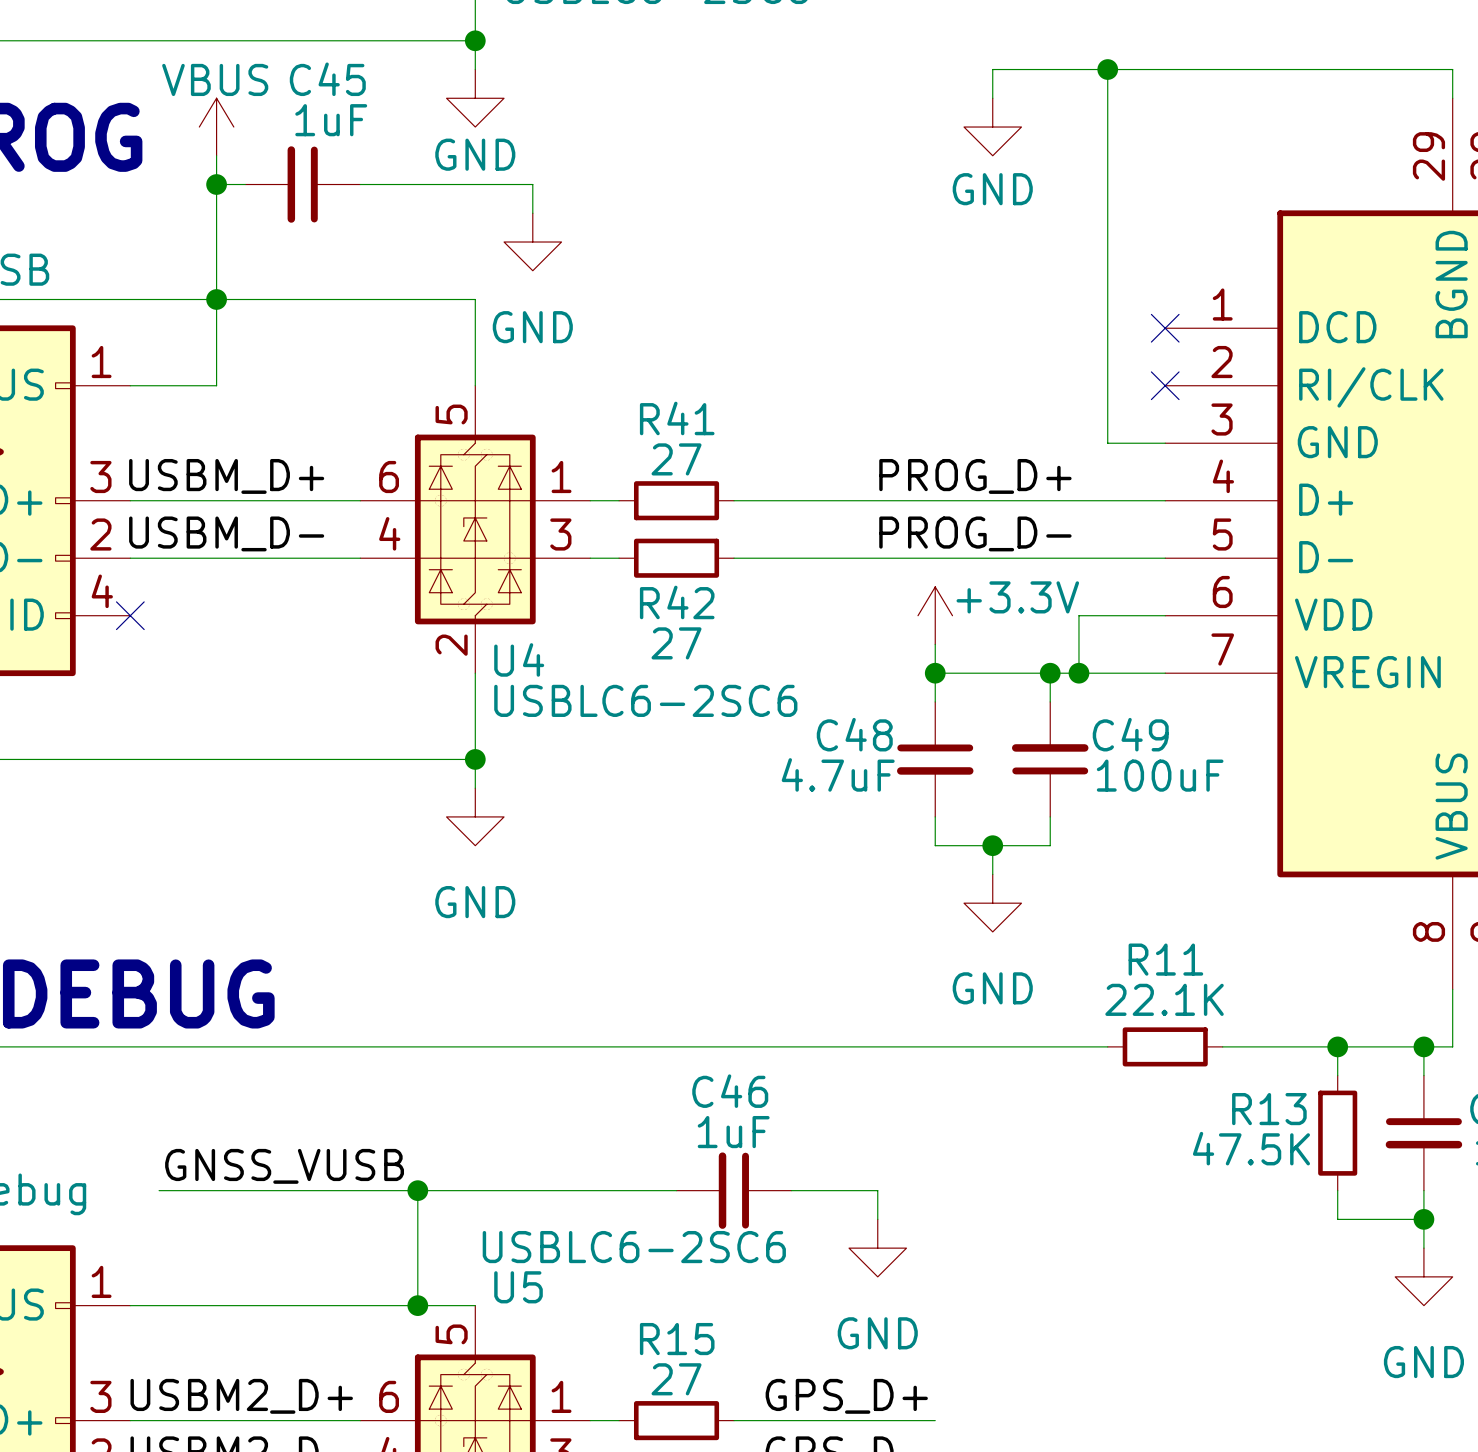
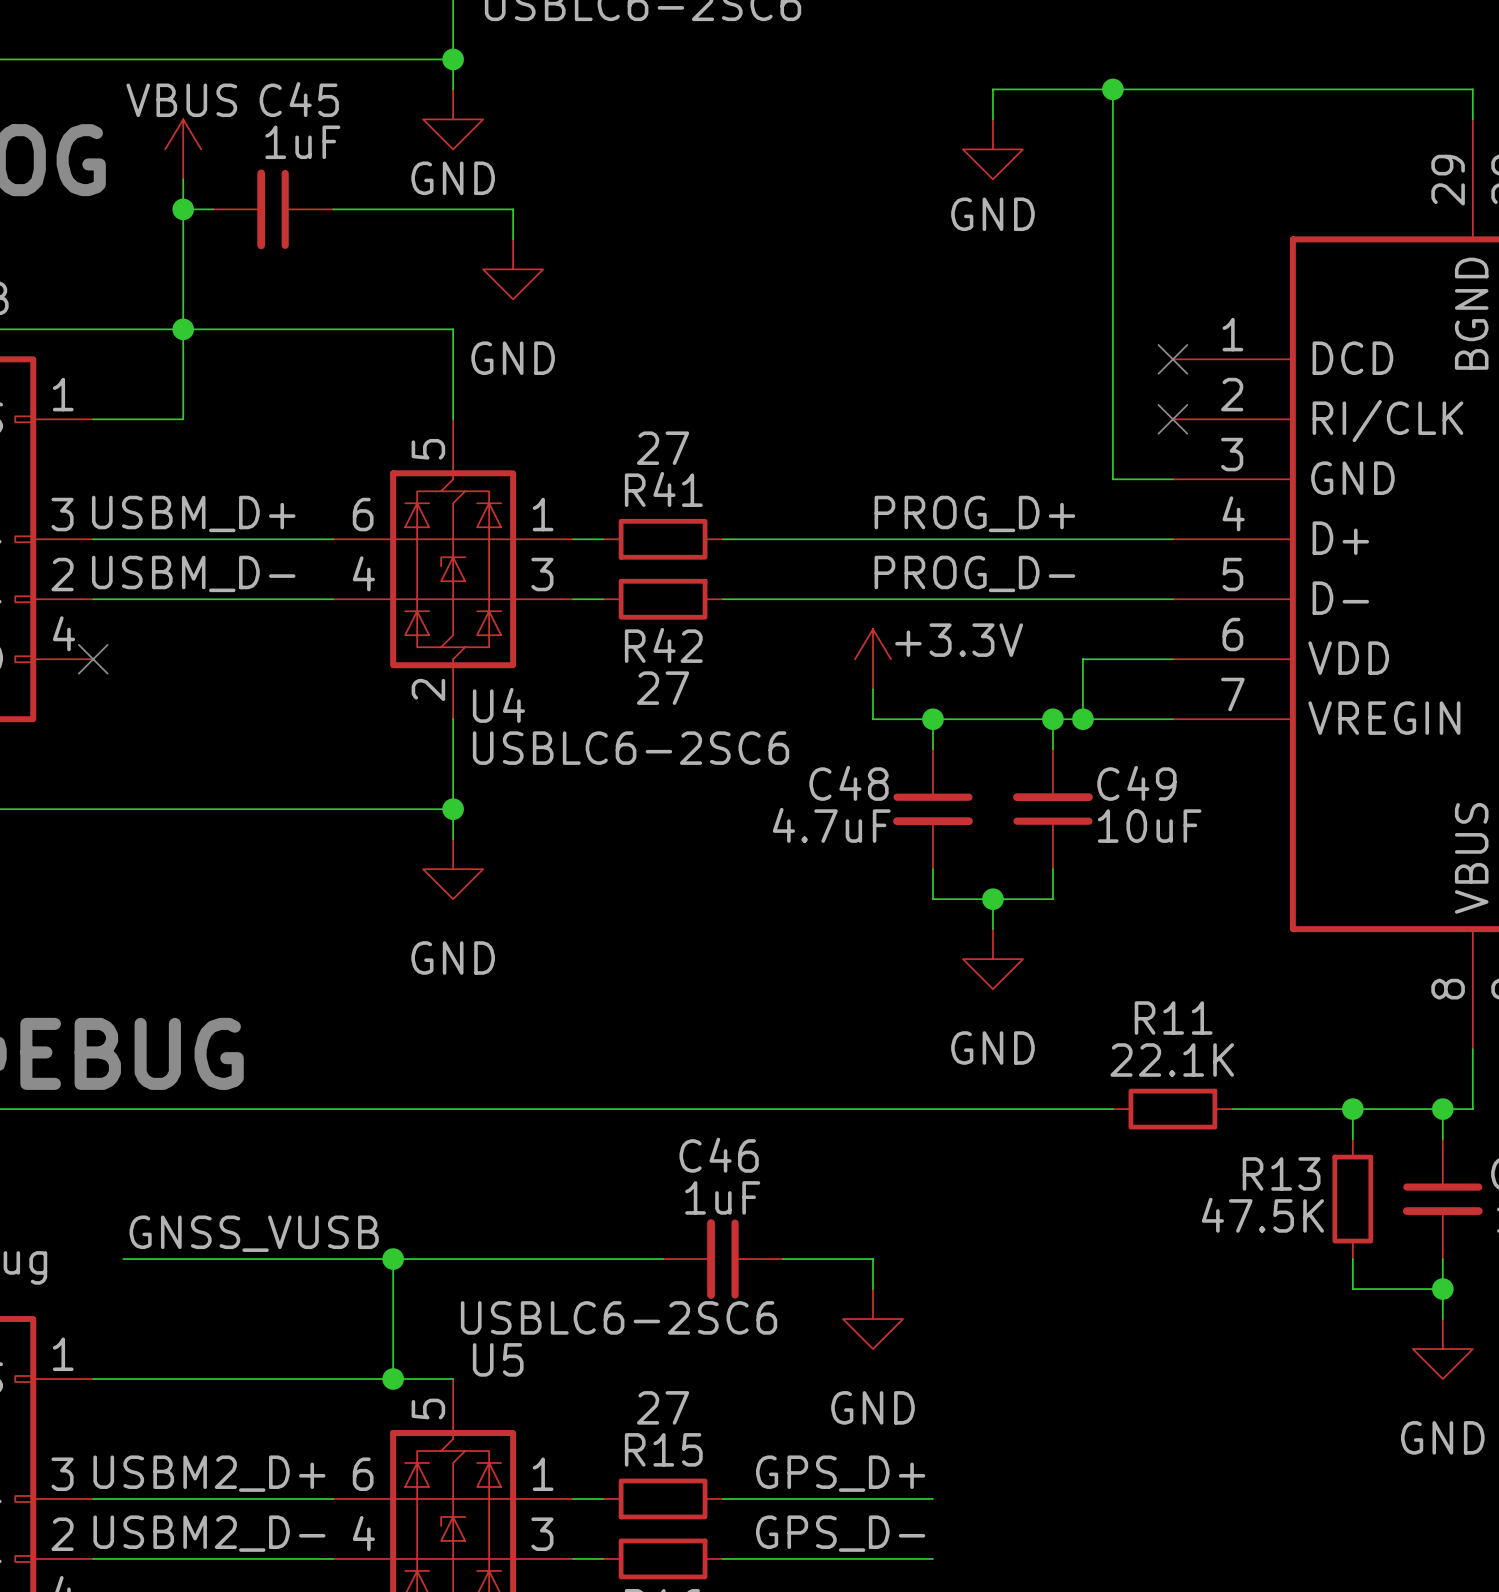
R41 name position: R41 (677, 418) -> R41 (663, 489)
R41 value position: 27 (676, 459) -> 27 (663, 448)
power symbol position: +3.3V (935, 615) -> +3.3V (873, 659)
wire: (935, 644) (935, 673) -> (873, 689) (873, 719) (932, 719)
C49 value: 100uF (1160, 775) -> 10uF (1149, 826)
R15 name position: R15 (677, 1339) -> R15 (663, 1449)
R15 value position: 27 (676, 1379) -> 27 (663, 1407)

